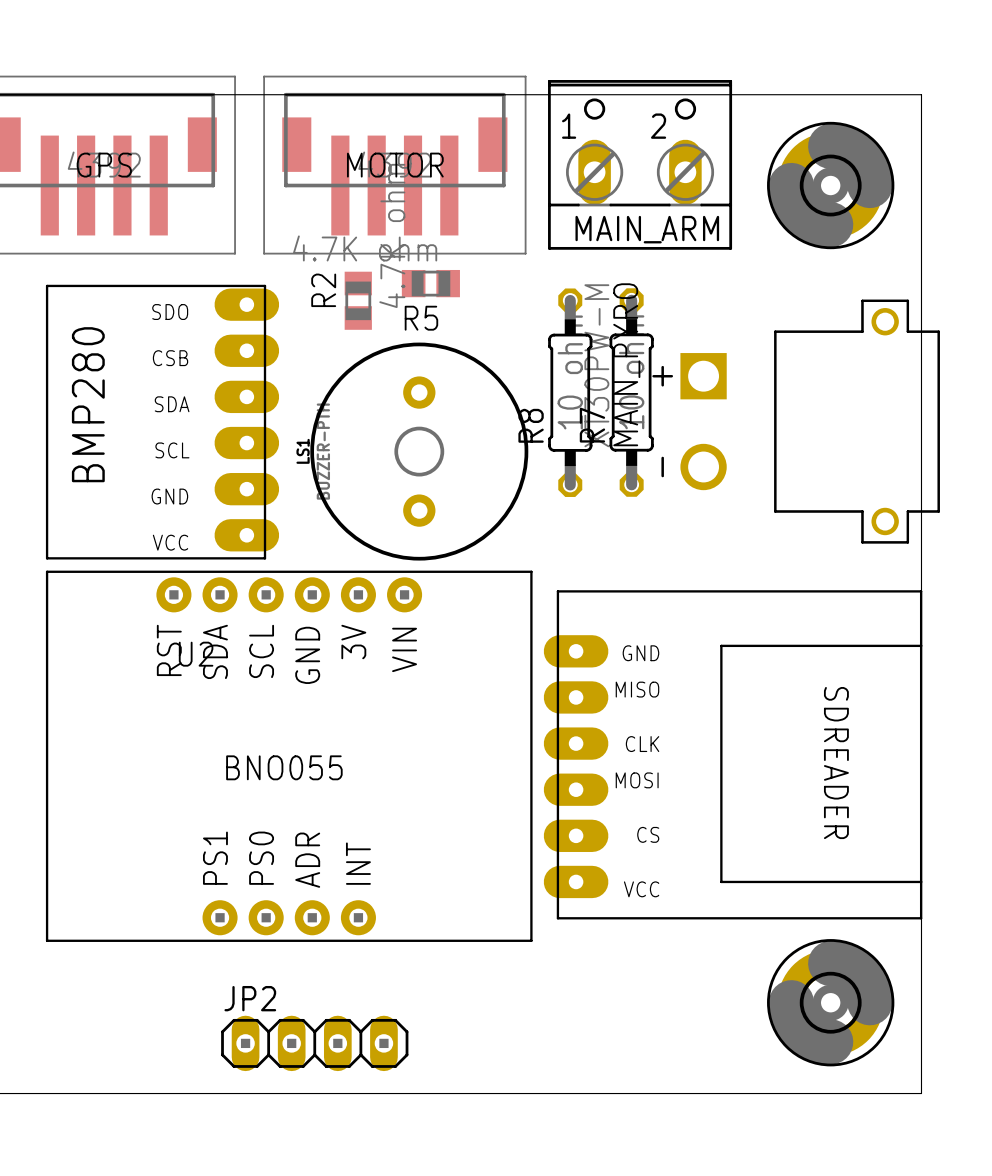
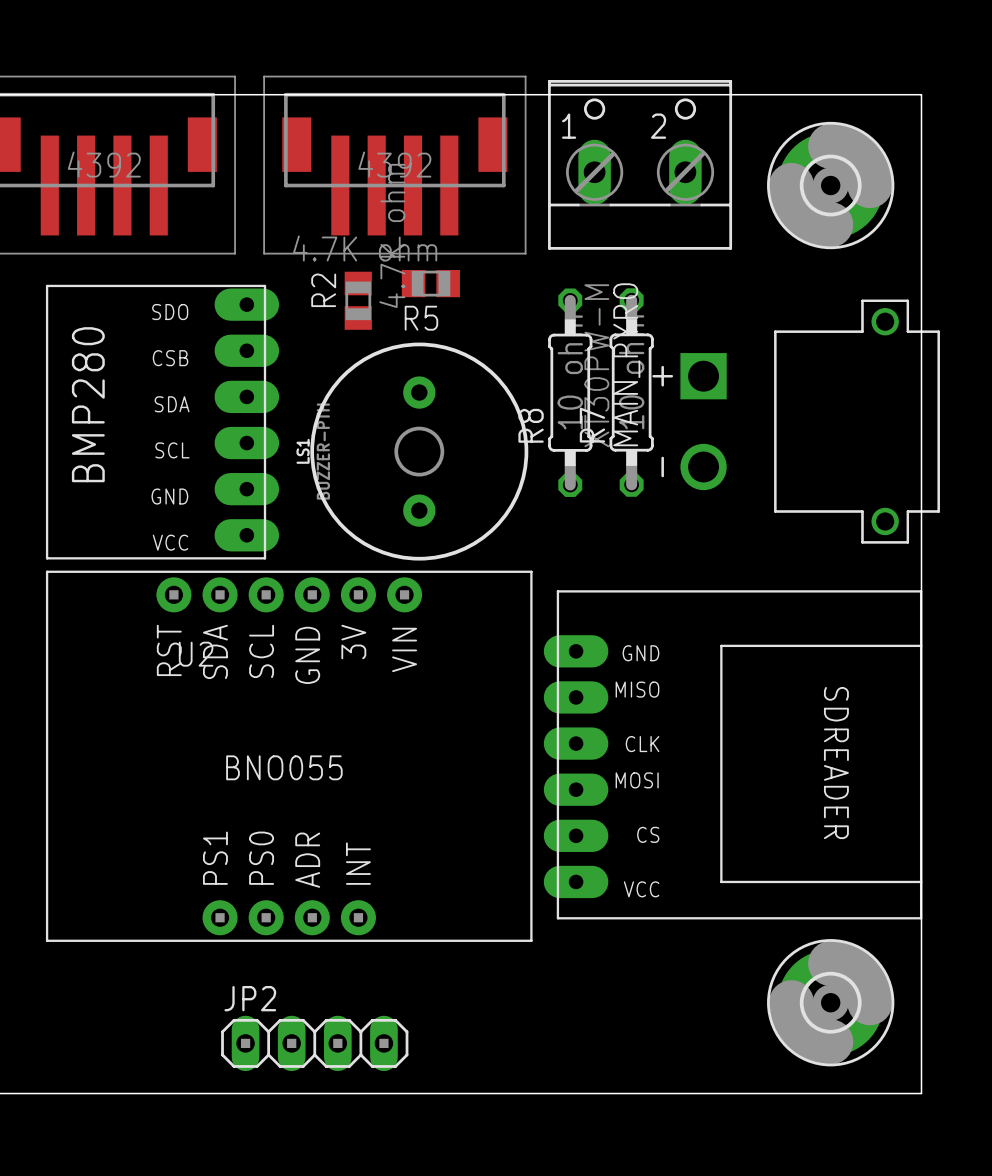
GPS name: GPS (104, 165) -> none
MOTOR name: MOTOR (395, 165) -> none
MAIN_ARM name: MAIN_ARM (647, 229) -> none

